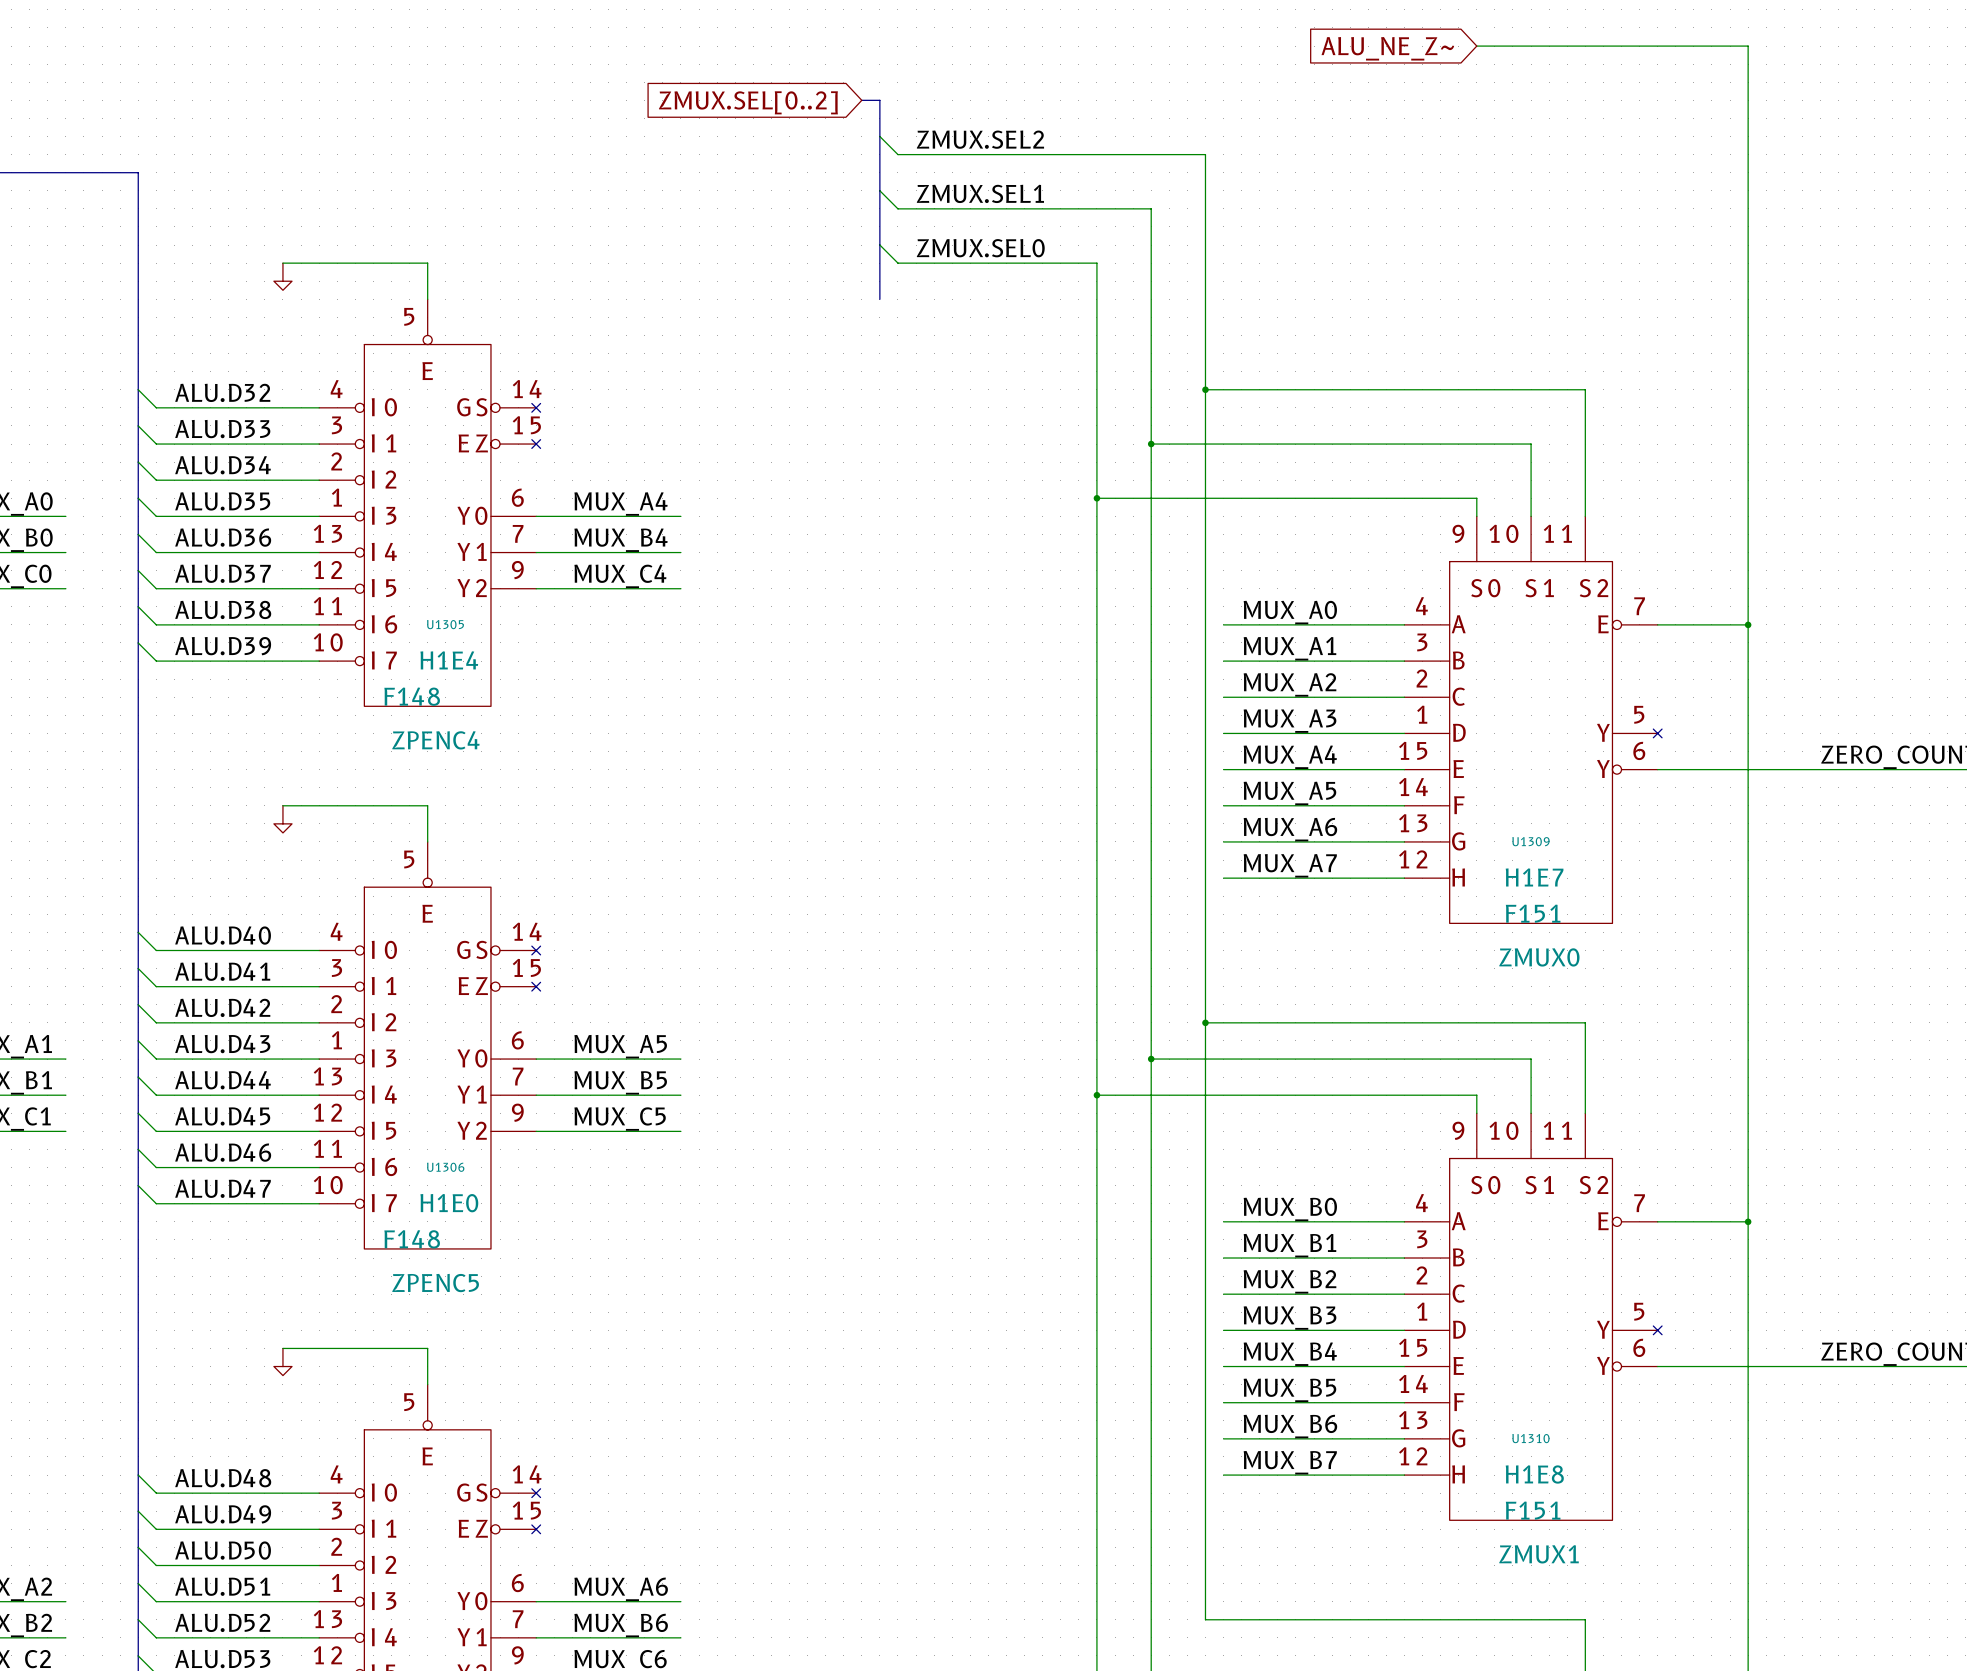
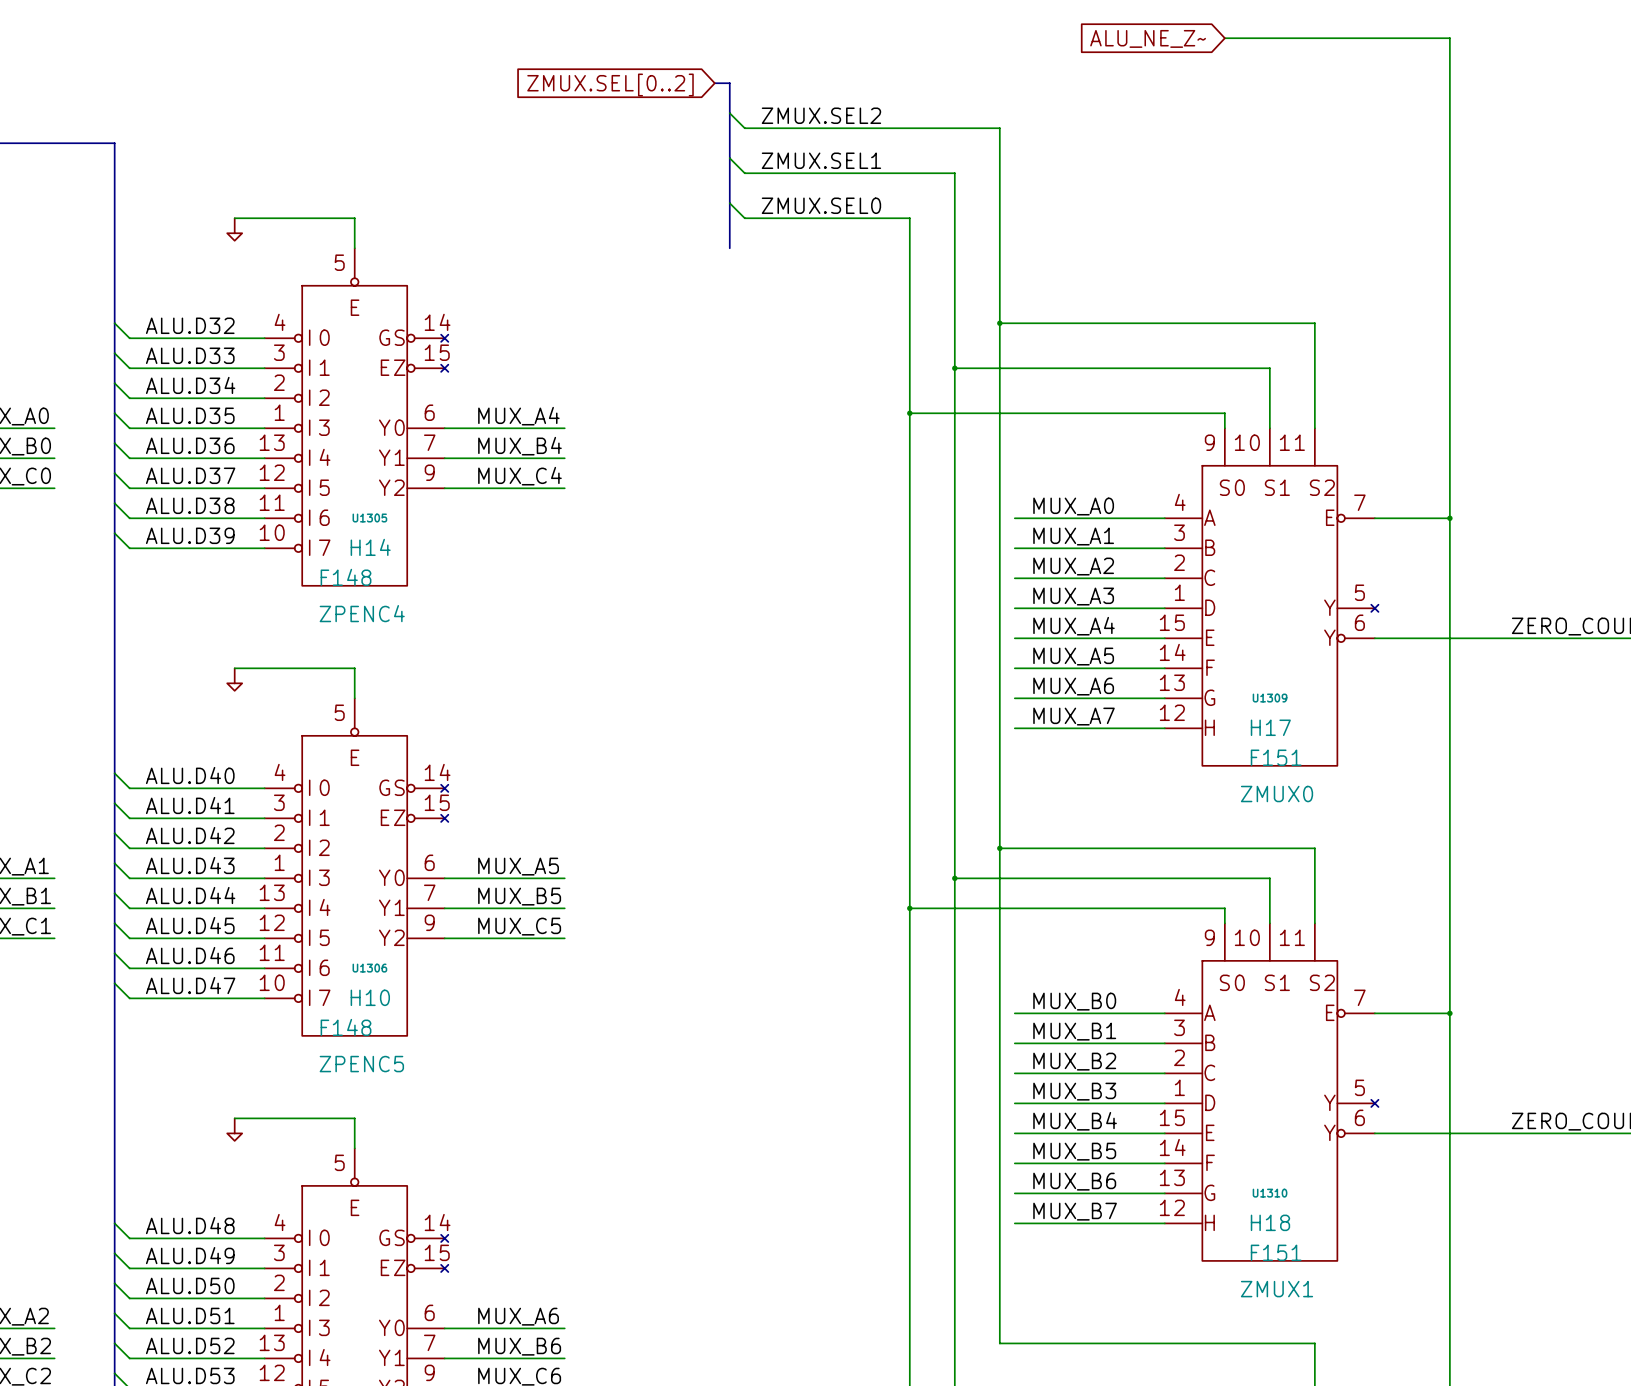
U1305 text: H1E4 (449, 660) -> H14 (370, 547)
U1309 text: H1E7 (1534, 877) -> H17 (1270, 727)
U1306 text: H1E0 (449, 1203) -> H10 (370, 997)
U1310 text: H1E8 (1534, 1474) -> H18 (1270, 1222)

